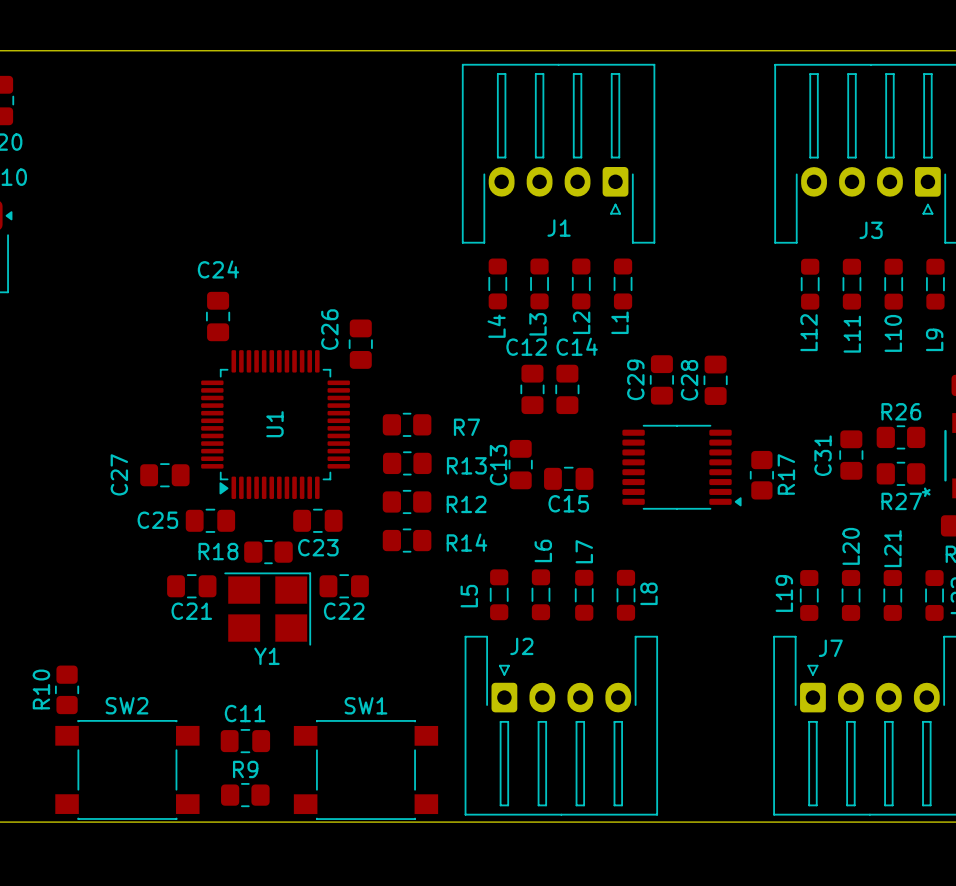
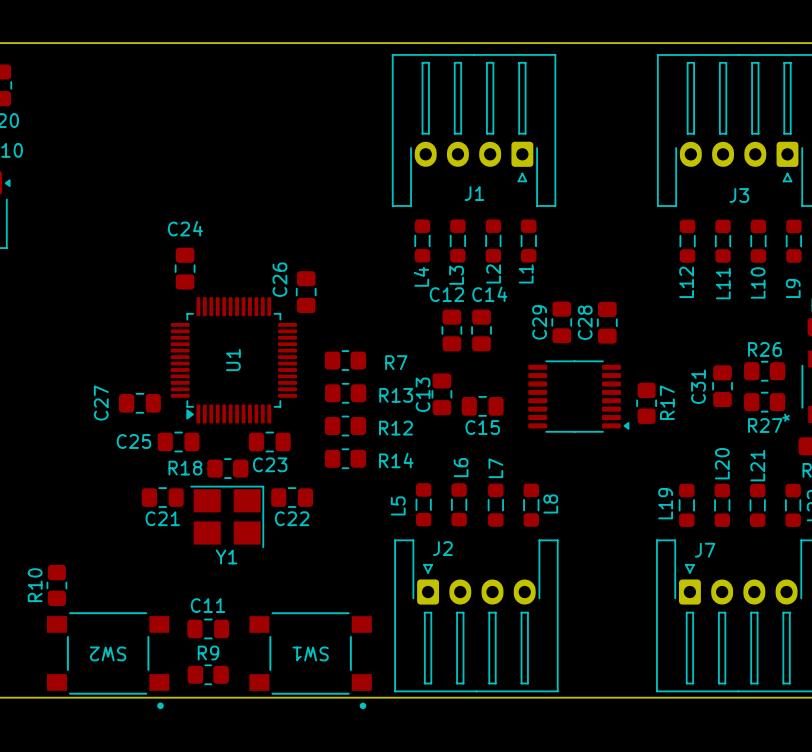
SW2 name position: SW2 (127, 705) -> SW2 (108, 653)
SW1 name position: SW1 (365, 705) -> SW1 (310, 653)
SW2 footprint: [55, 719, 200, 820] -> [46, 612, 170, 710]
SW1 footprint: [293, 720, 439, 820] -> [249, 612, 372, 710]

